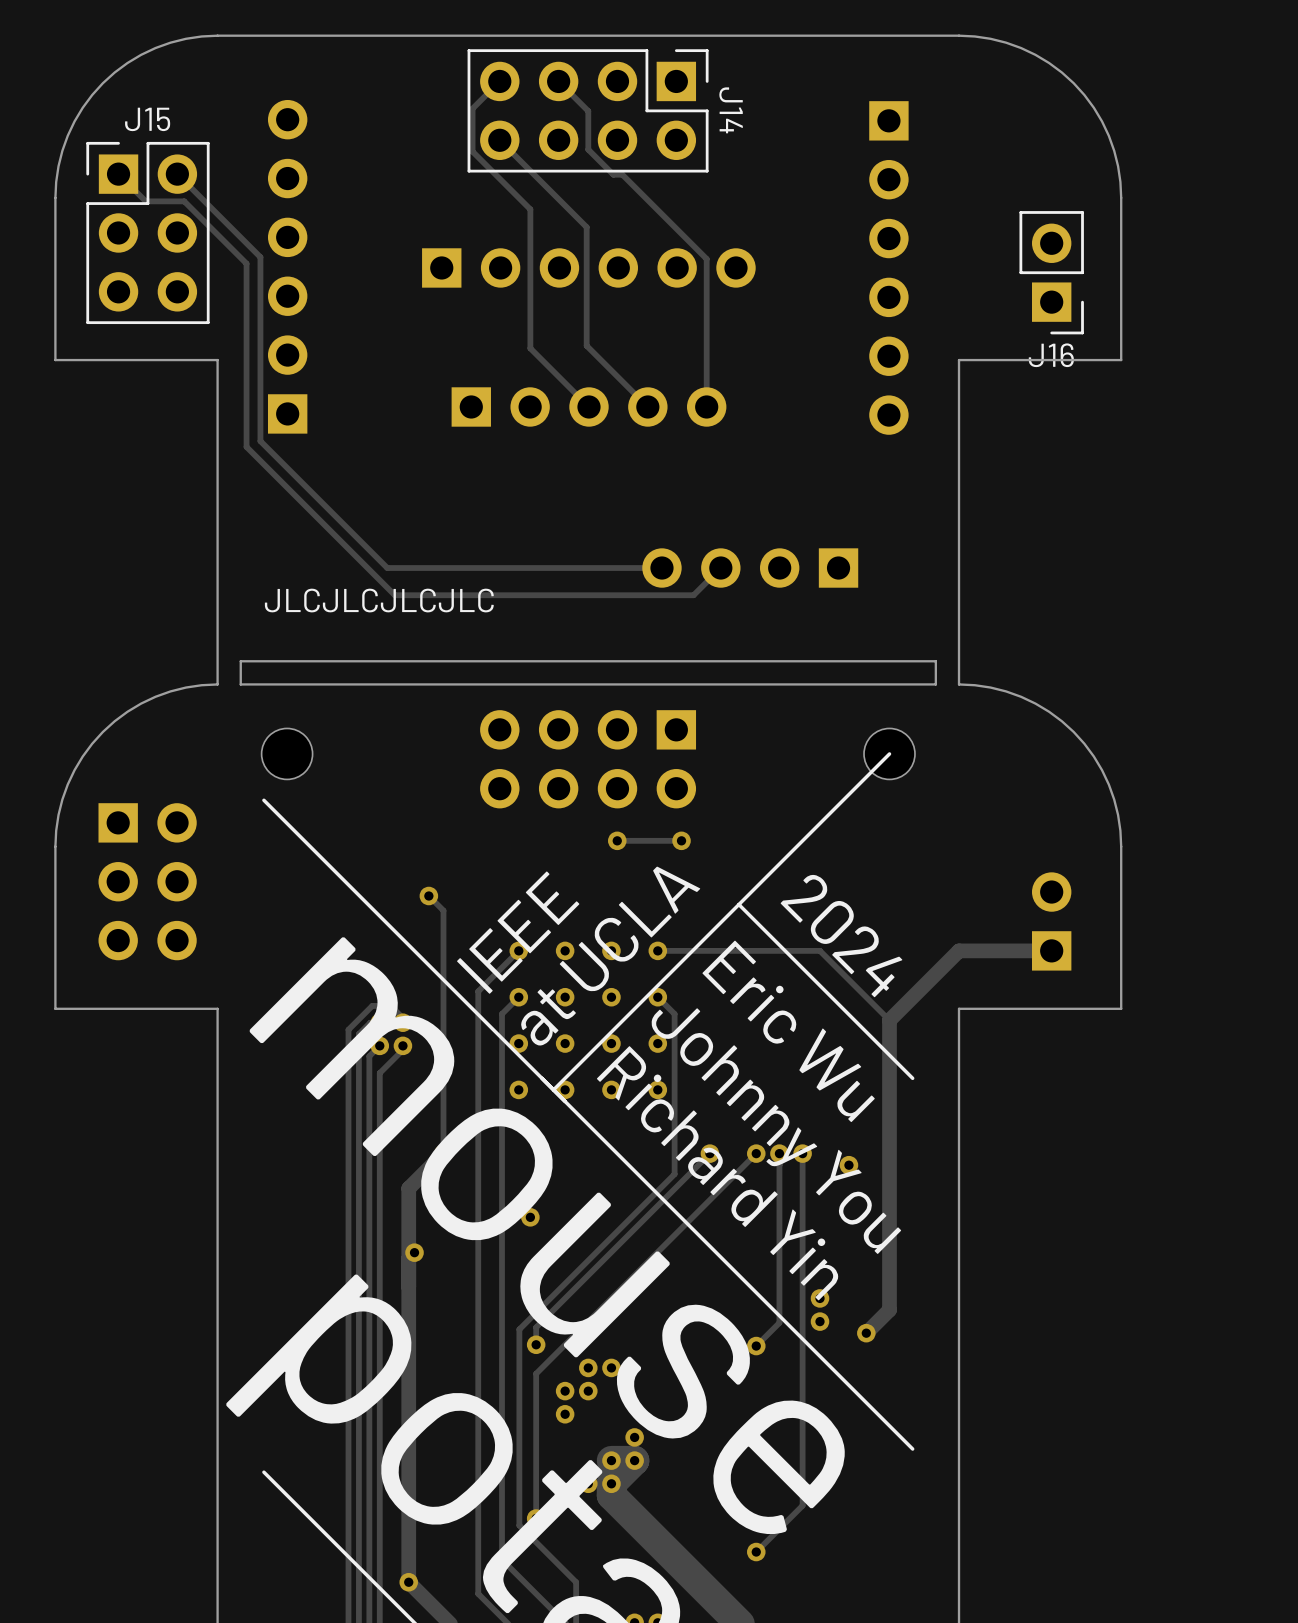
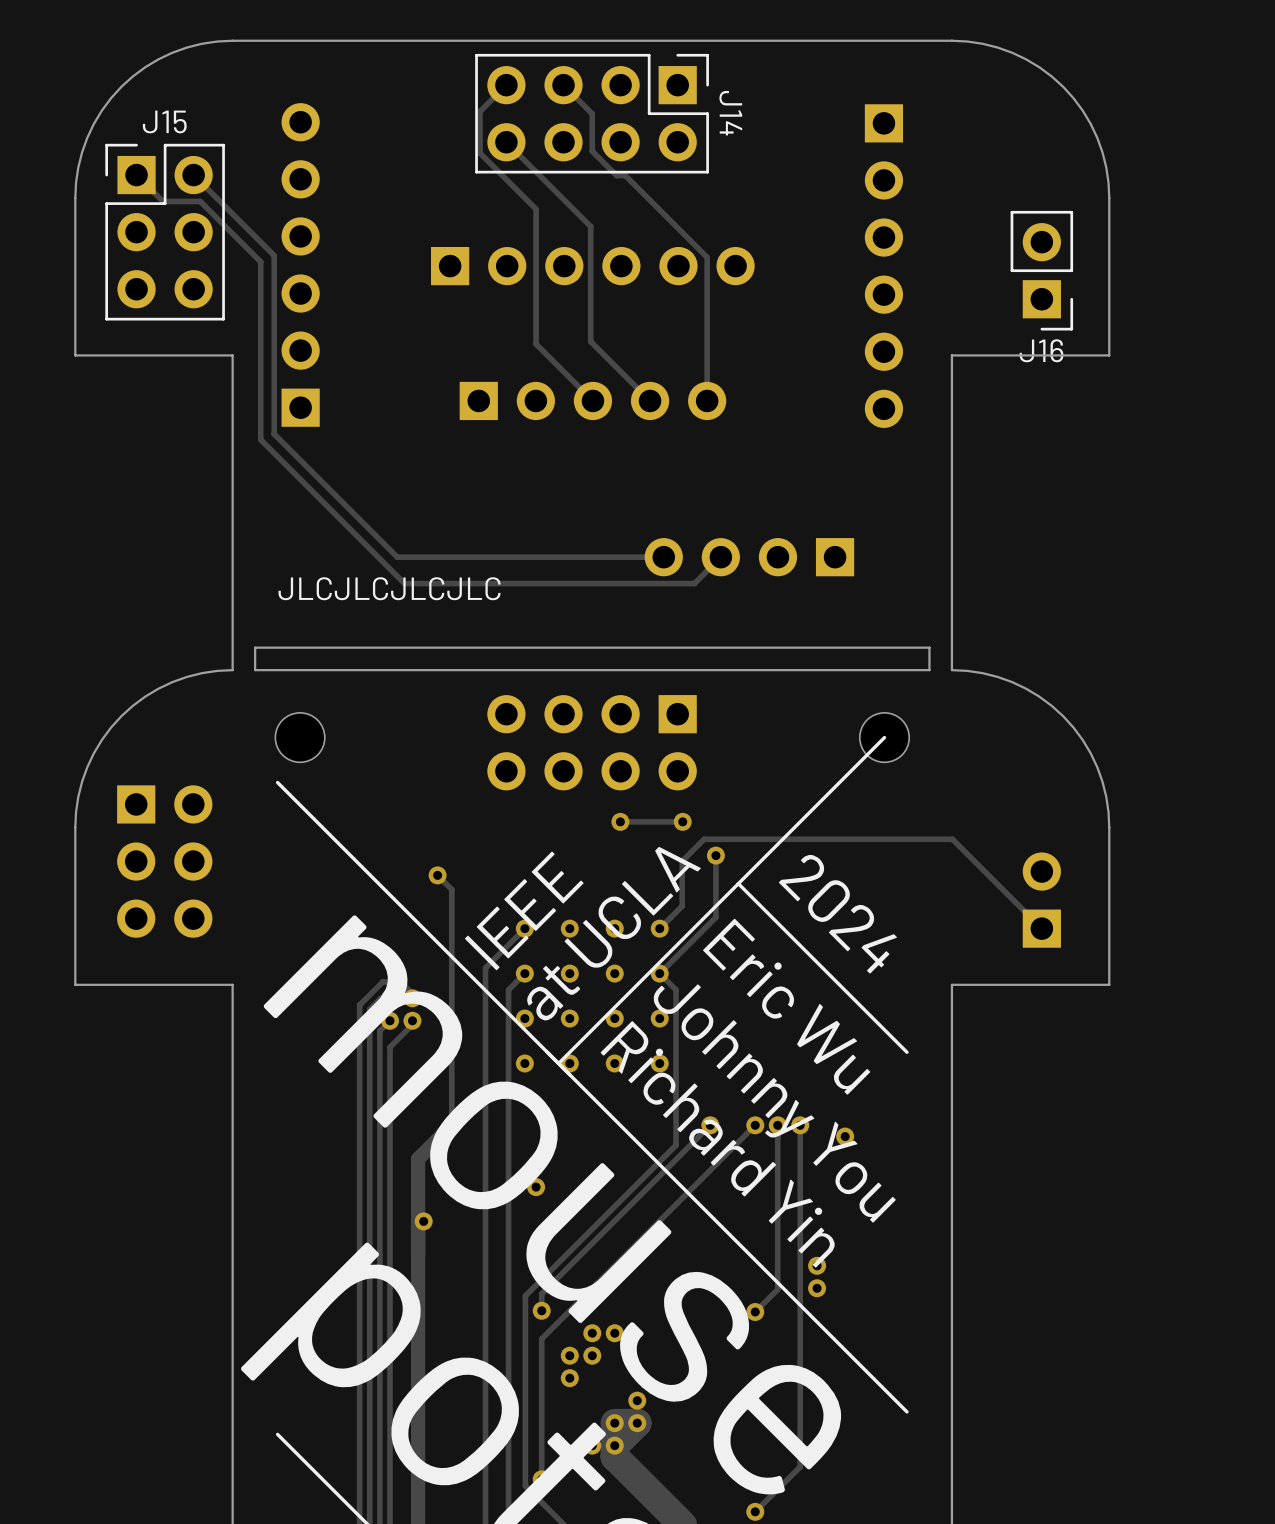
track: none -> (715, 855) (715, 917) (659, 973)
via: none -> (715, 855)
track: (657, 950) (819, 950) (889, 1020) -> (659, 928) (682, 906) (682, 861) (704, 839) (952, 839) (1041, 928)
track: (1051, 950) (959, 950) (889, 1020) -> none
track: (889, 1020) (889, 1310) (866, 1333) -> none
via: (866, 1333) -> none

